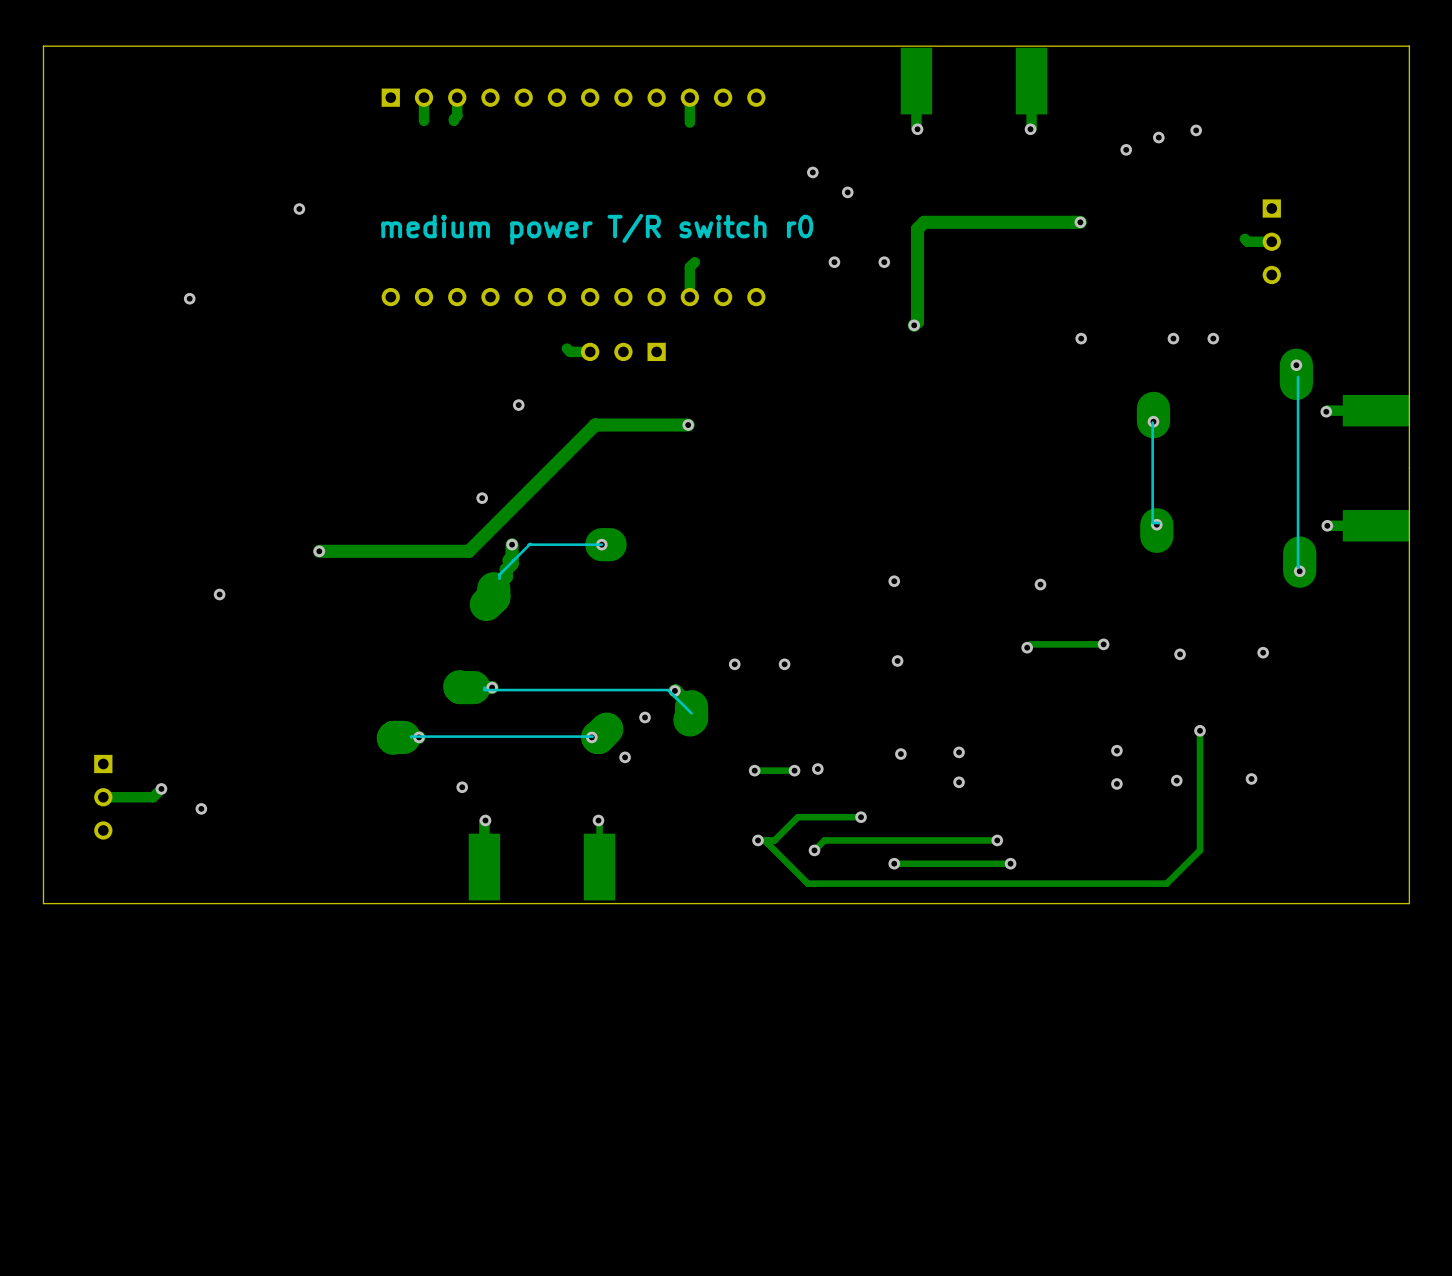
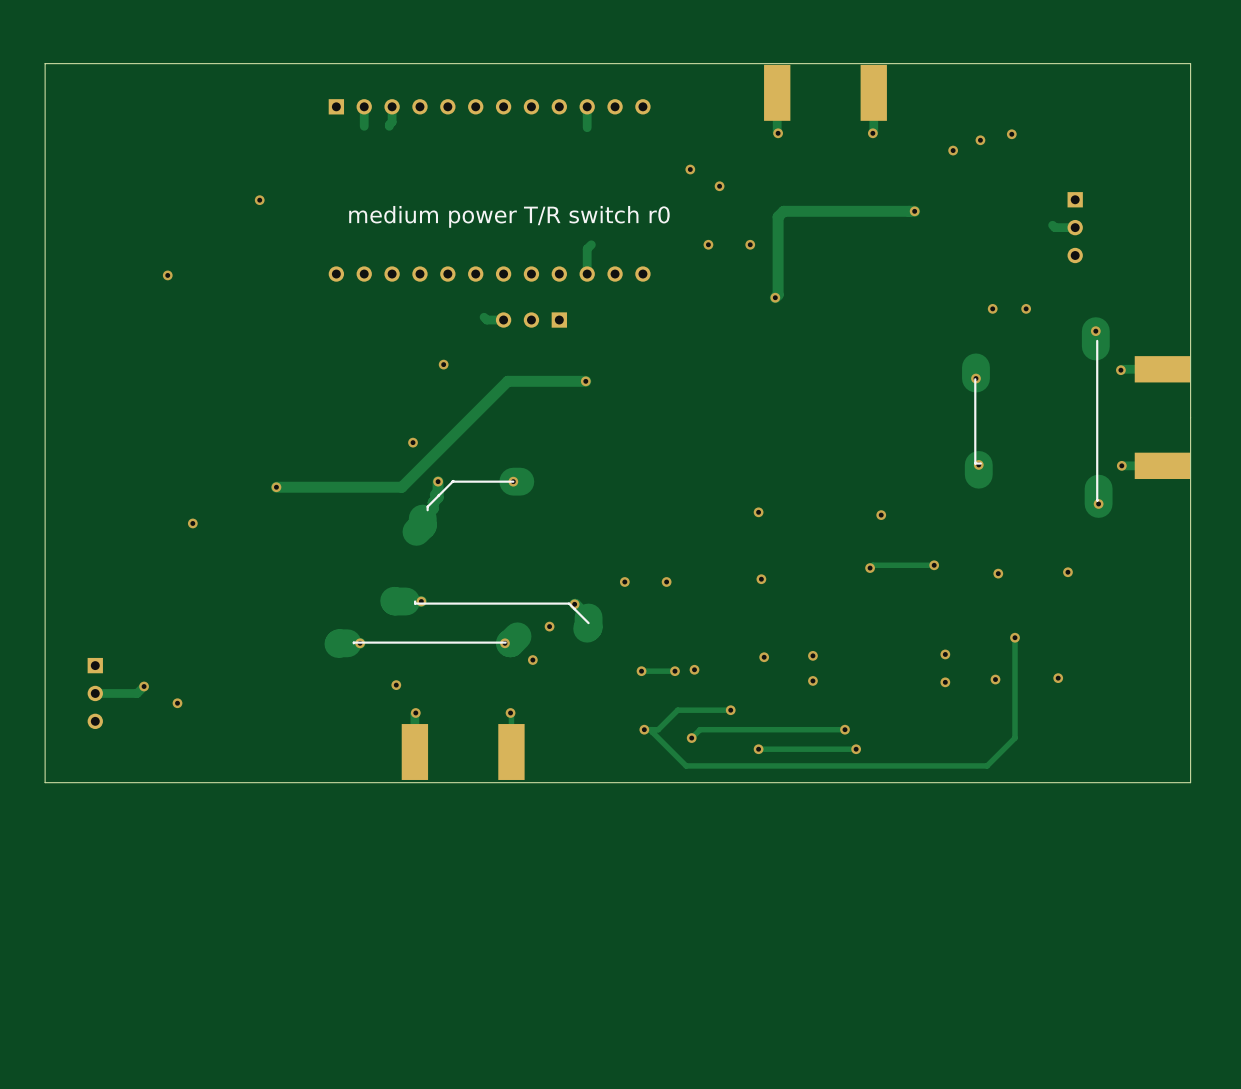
via: (1081, 338) -> none

